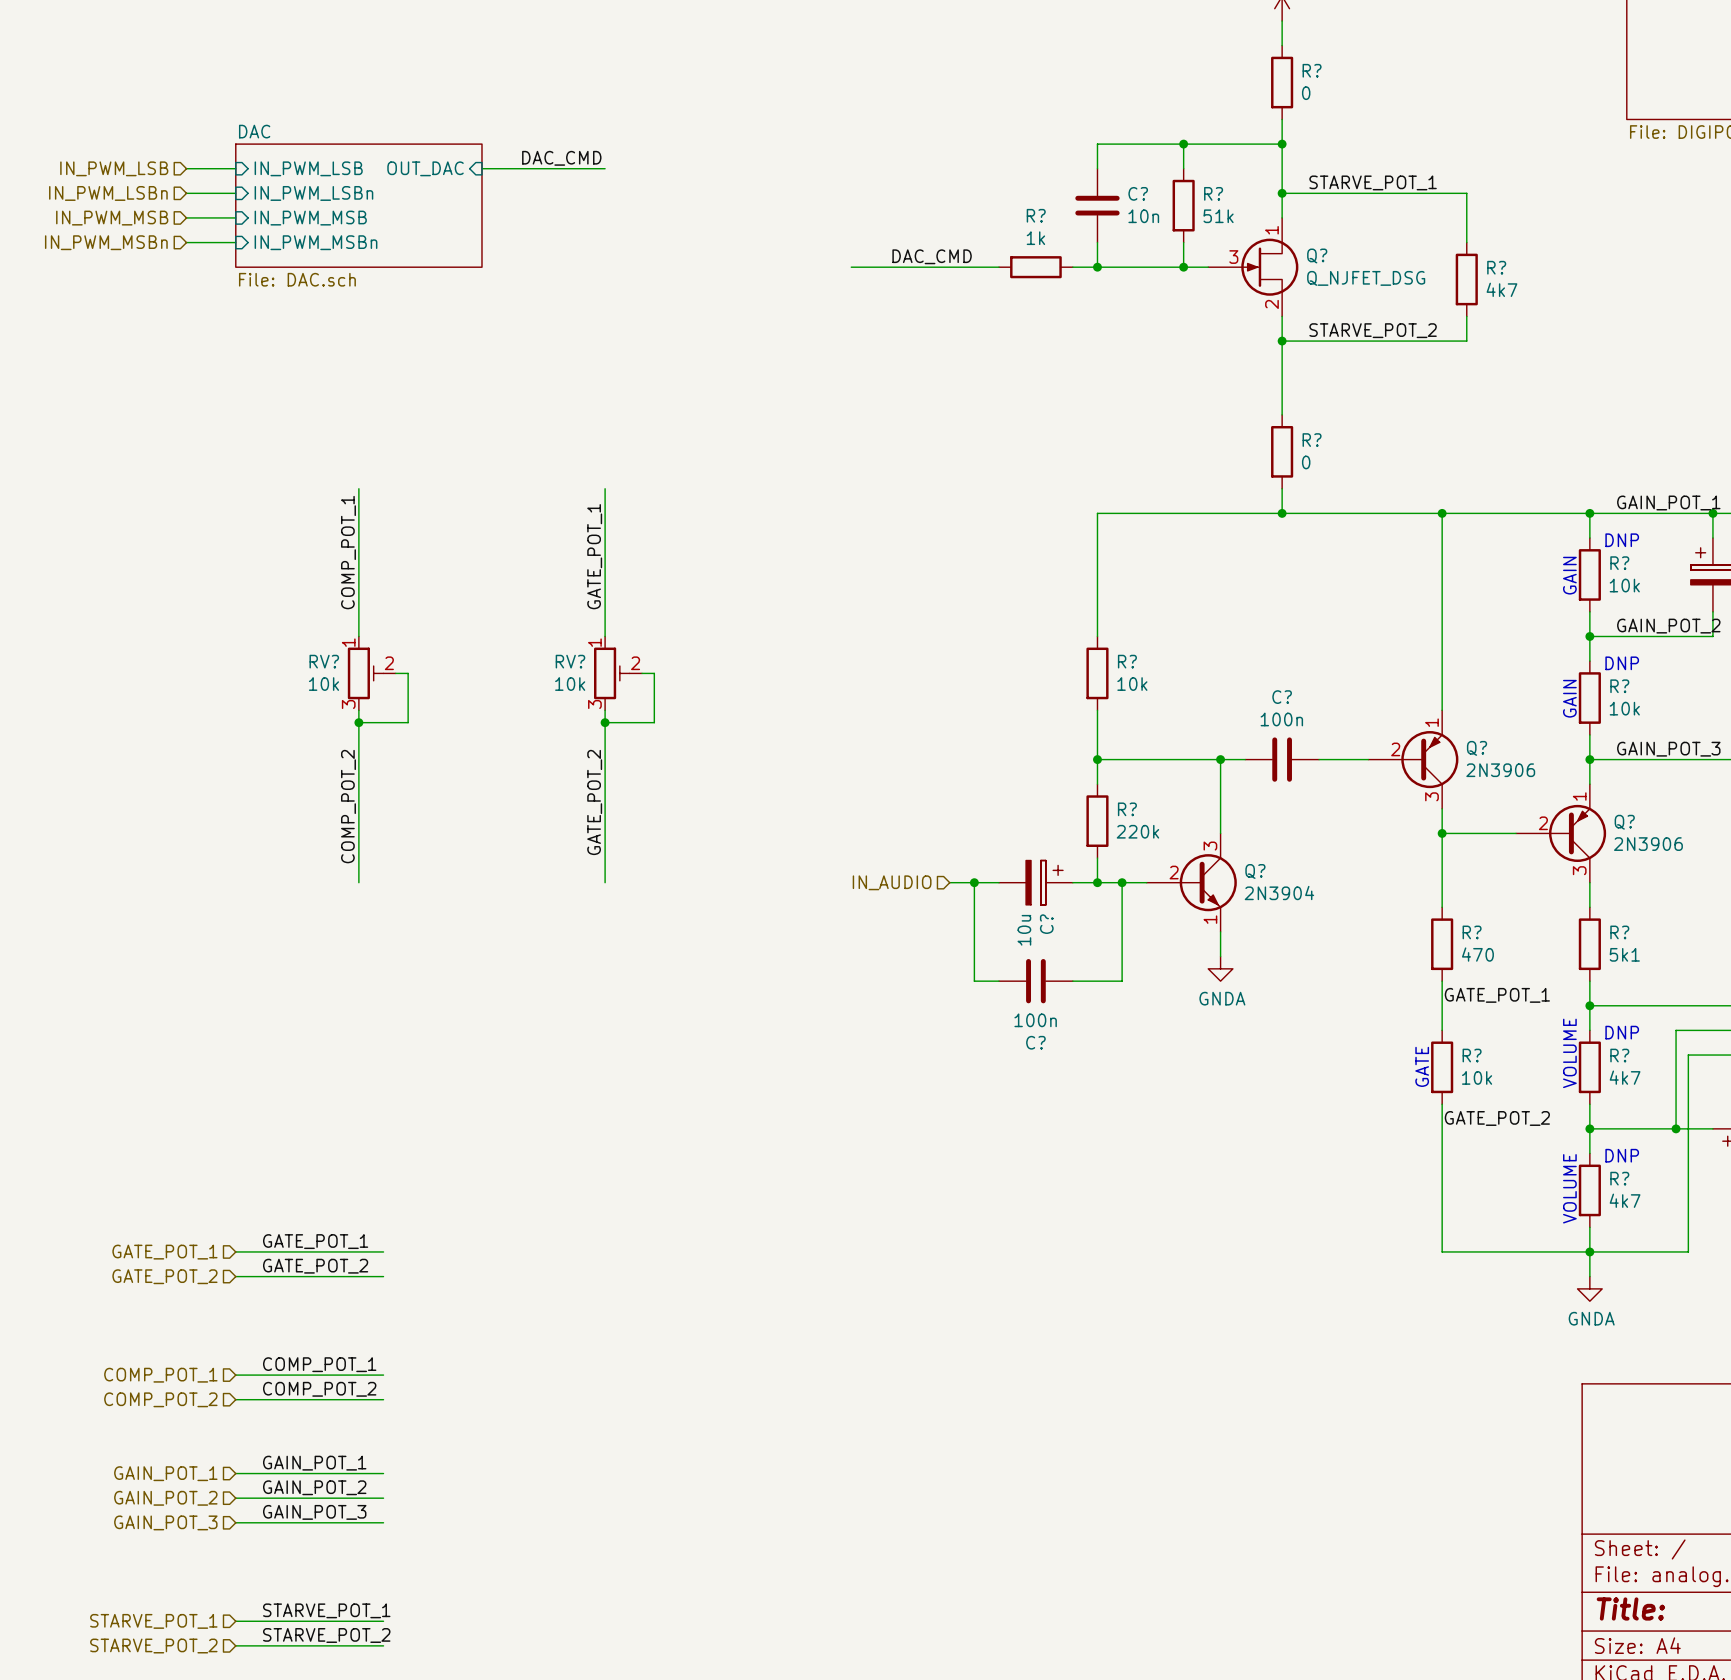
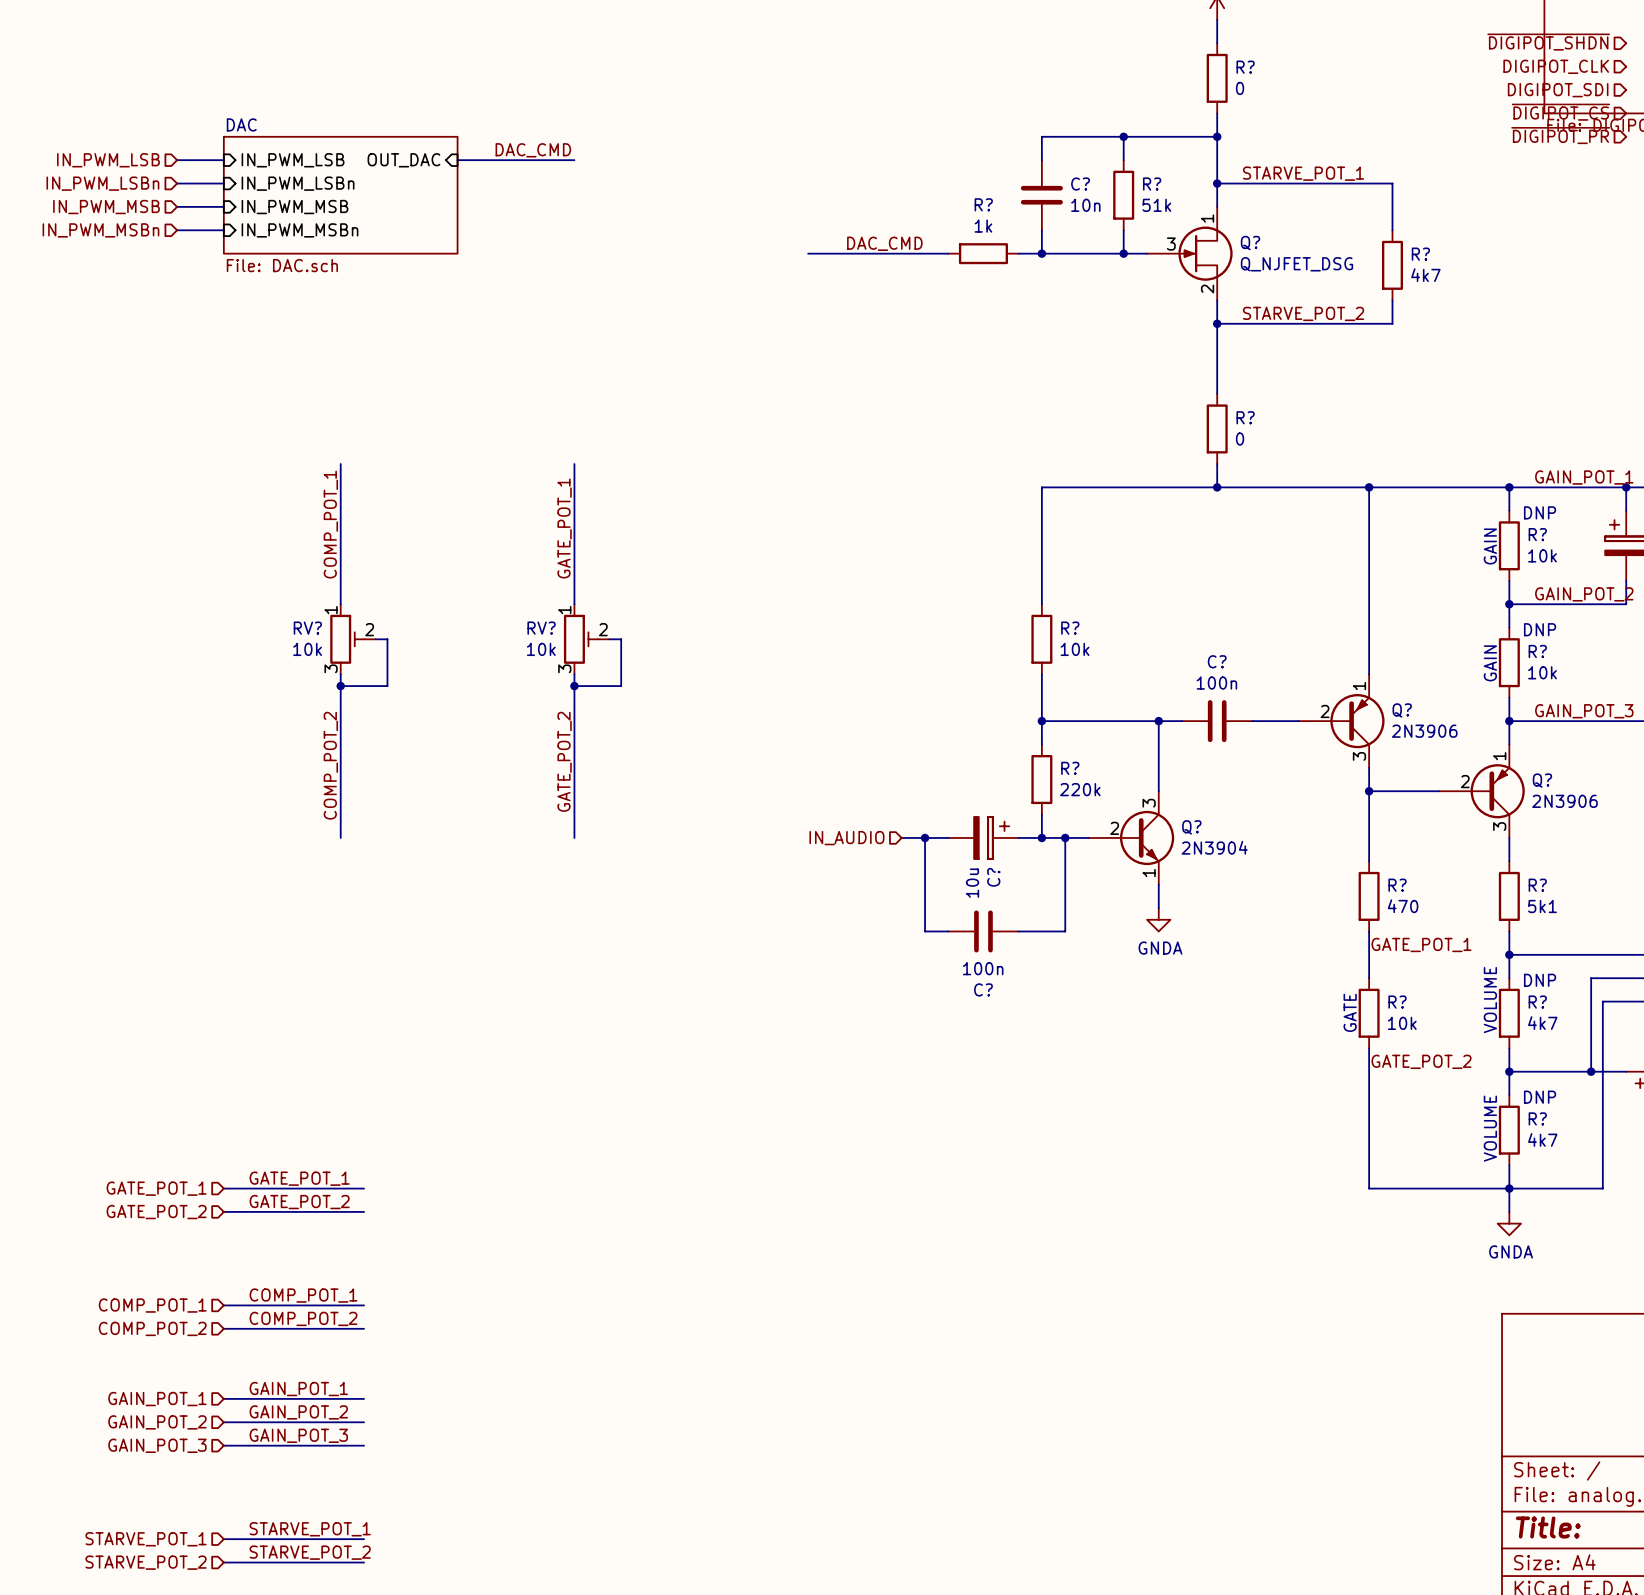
hierarchical label: none -> ~{DIGIPOT_SHDN} (1548, 42)
hierarchical label: none -> DIGIPOT_CLK (1556, 66)
hierarchical label: none -> DIGIPOT_SDI (1558, 90)
hierarchical label: none -> ~{DIGIPOT_CS} (1560, 112)
hierarchical label: none -> ~{DIGIPOT_PR} (1560, 135)

